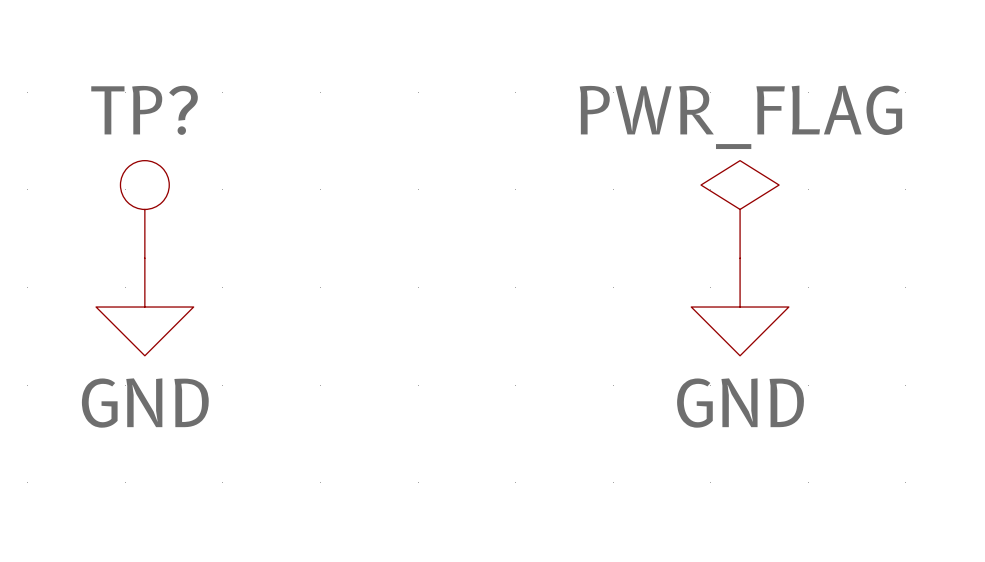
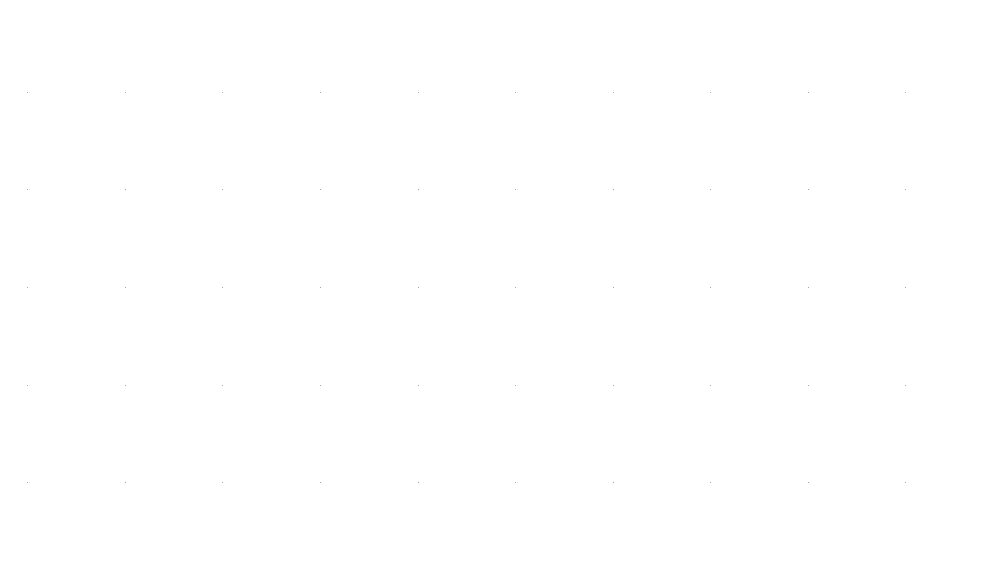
TP?: (144, 209) -> none
power symbol: PWR_FLAG (740, 209) -> none
power symbol: GND (144, 307) -> none
power symbol: GND (740, 307) -> none

